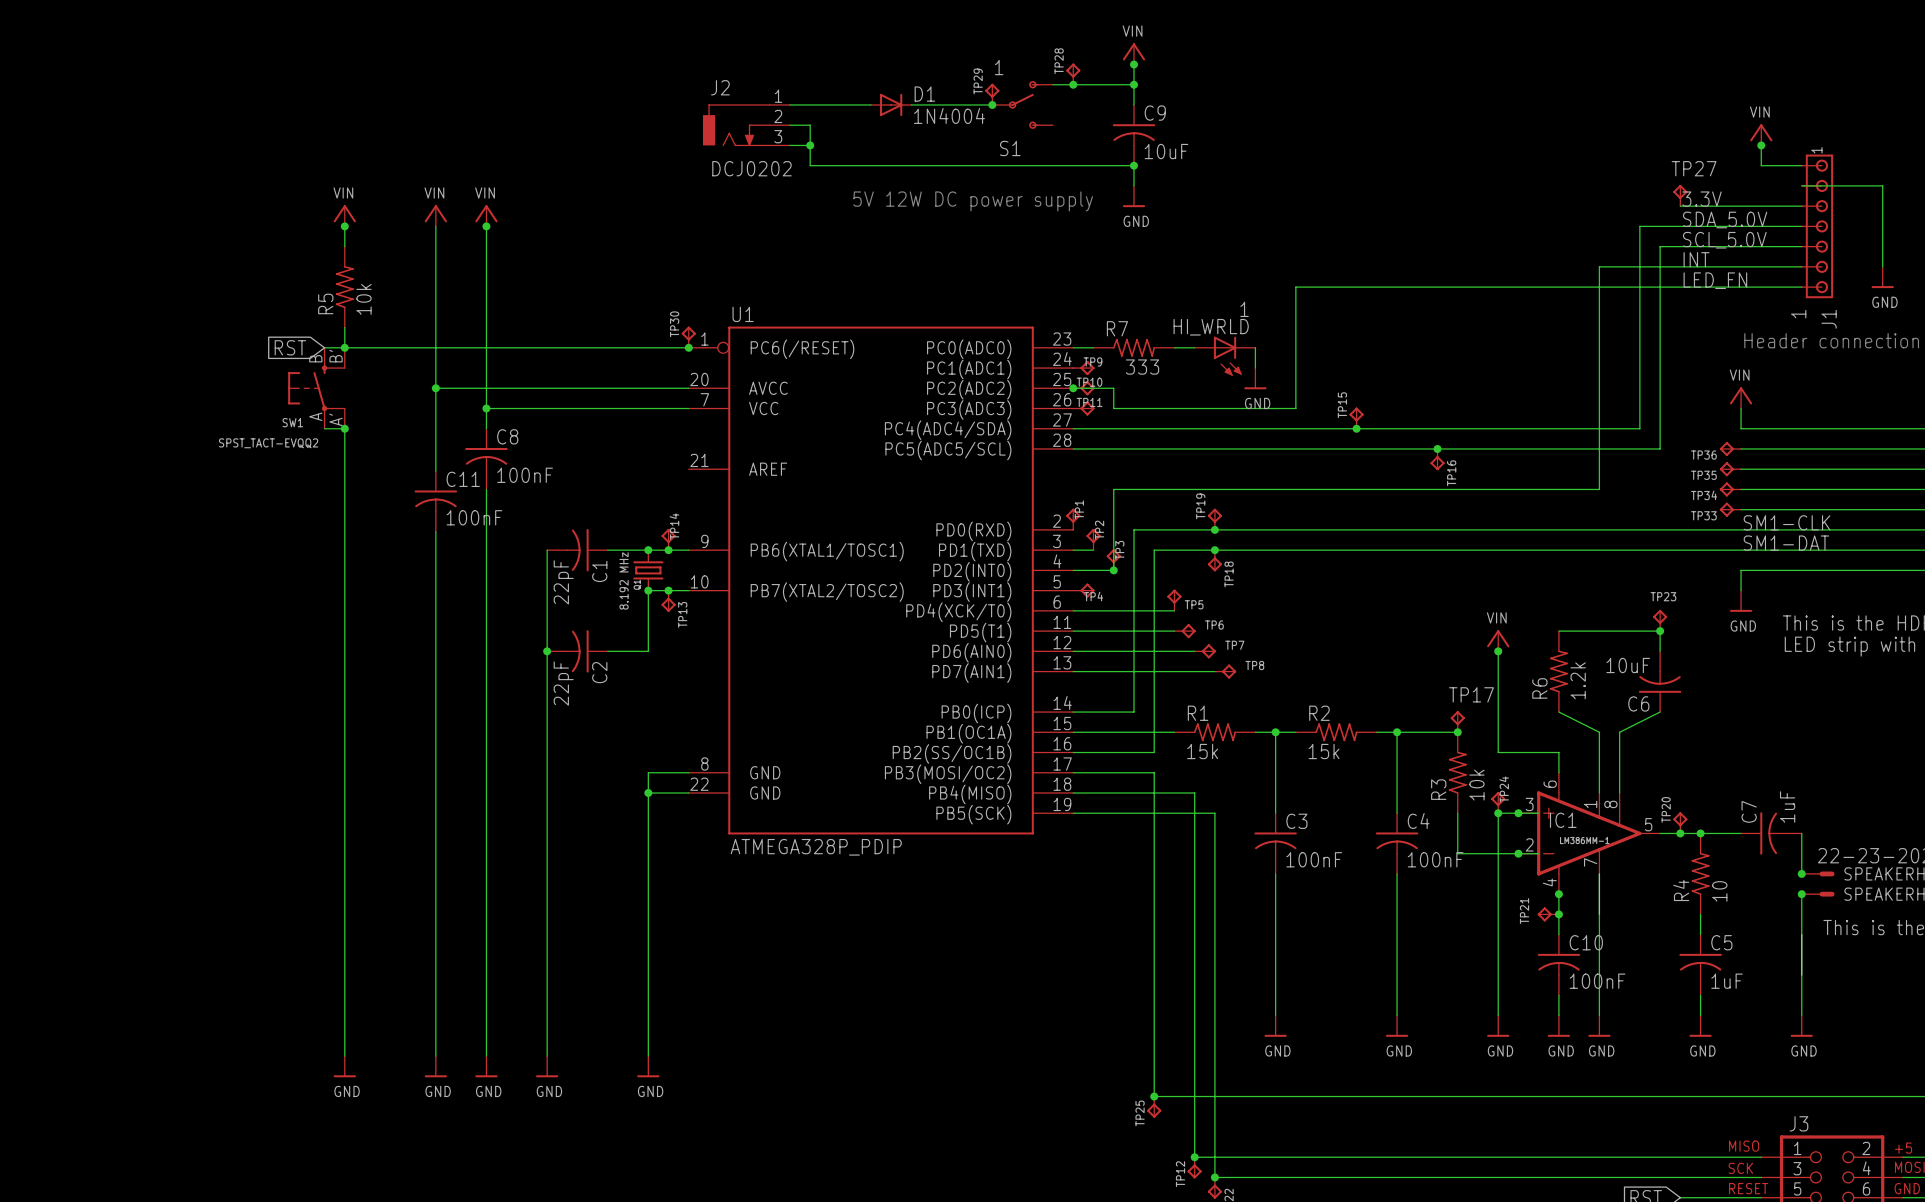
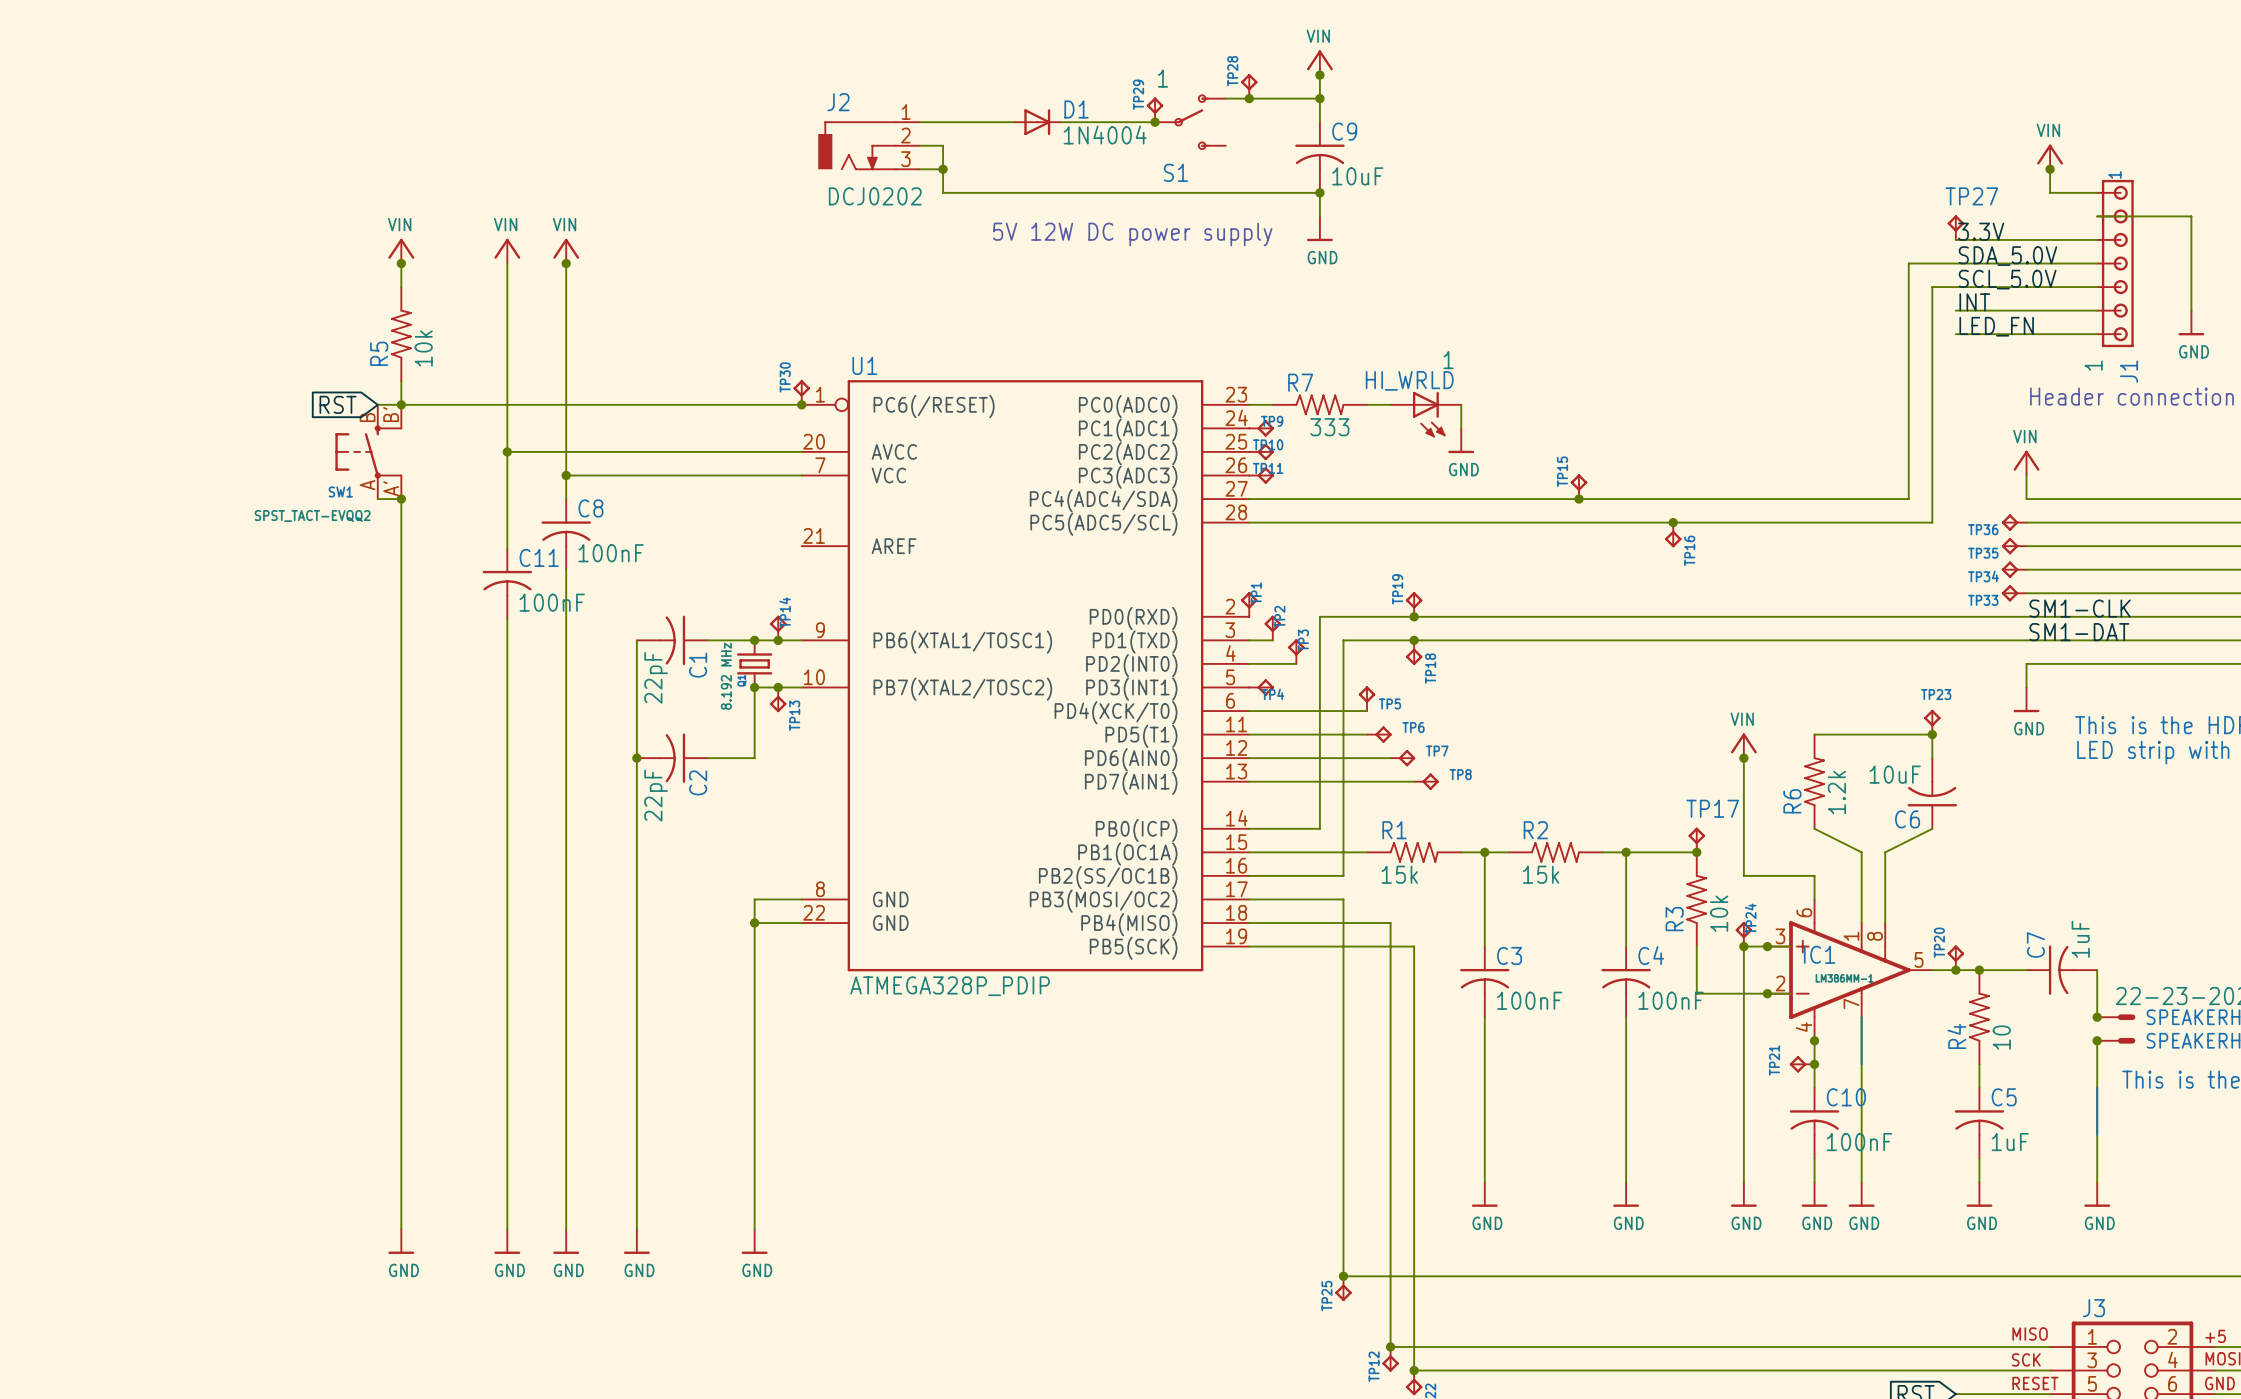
wire: (1680, 266) (1599, 266) (1599, 489) (1113, 489) (1113, 570) -> none
wire: (1680, 287) (1295, 287) (1295, 408) (1113, 408) (1113, 388) (1073, 388) -> none
junction: (1073, 388) -> none
junction: (1113, 570) -> none

